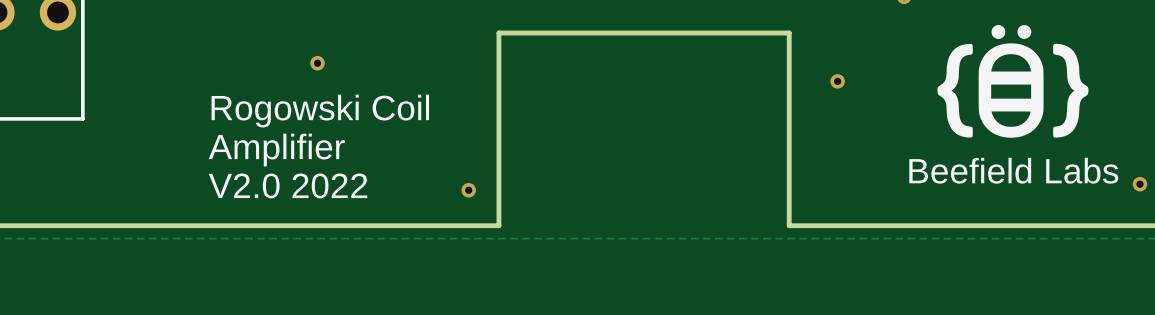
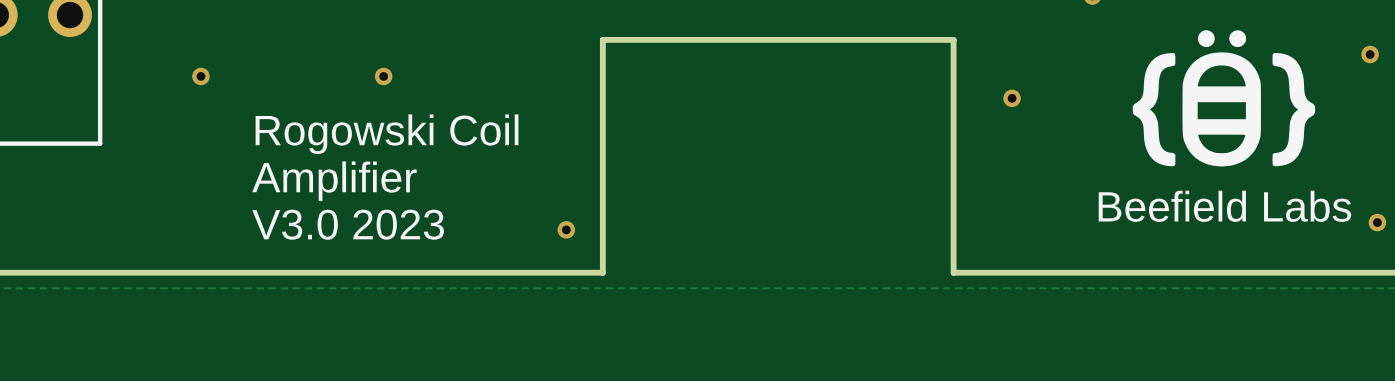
via: none -> (1370, 54)
via: none -> (200, 76)
text: V2.0 2022 (288, 185) -> V3.0 2023 (348, 224)

